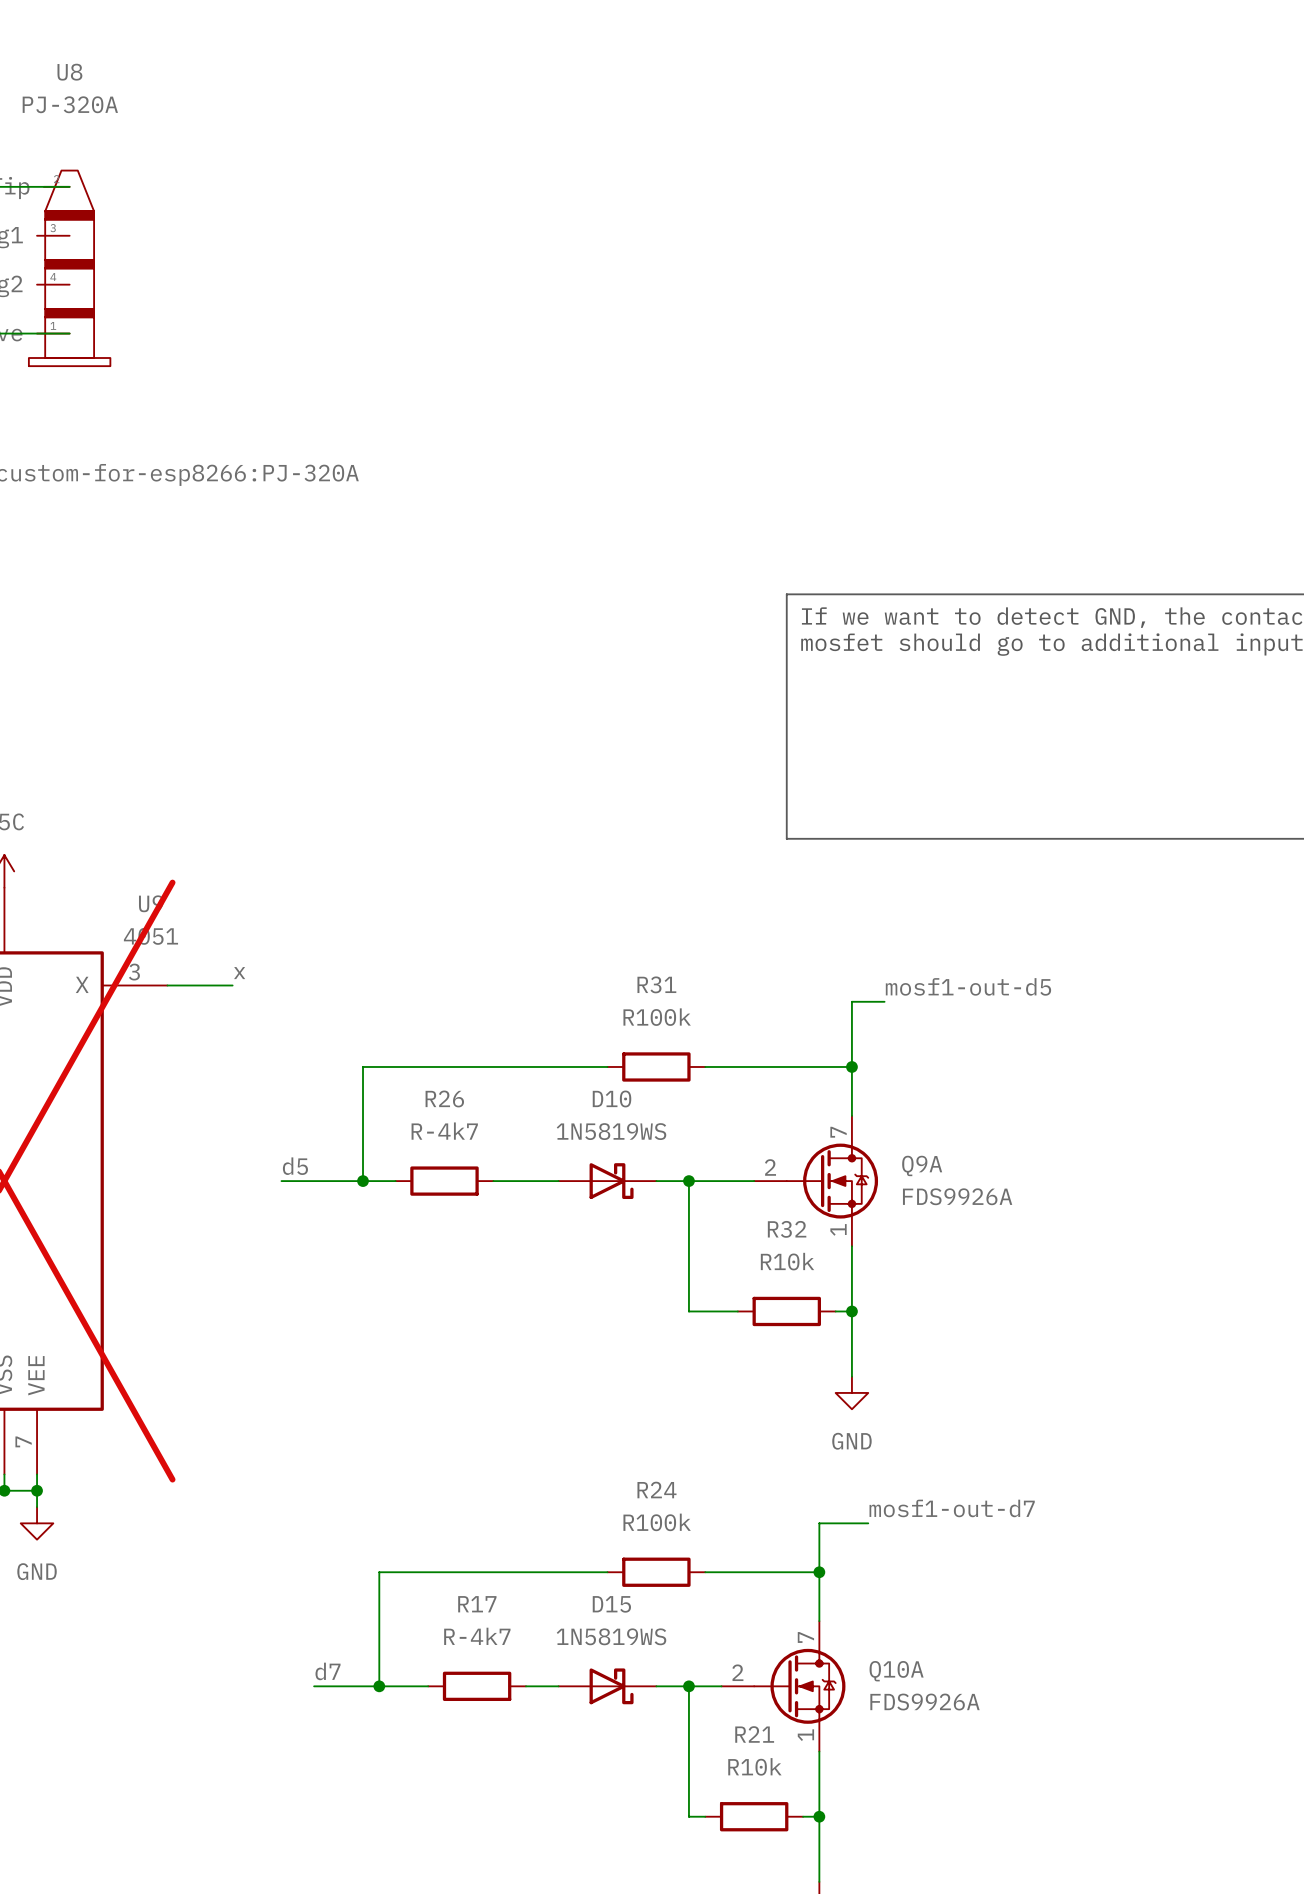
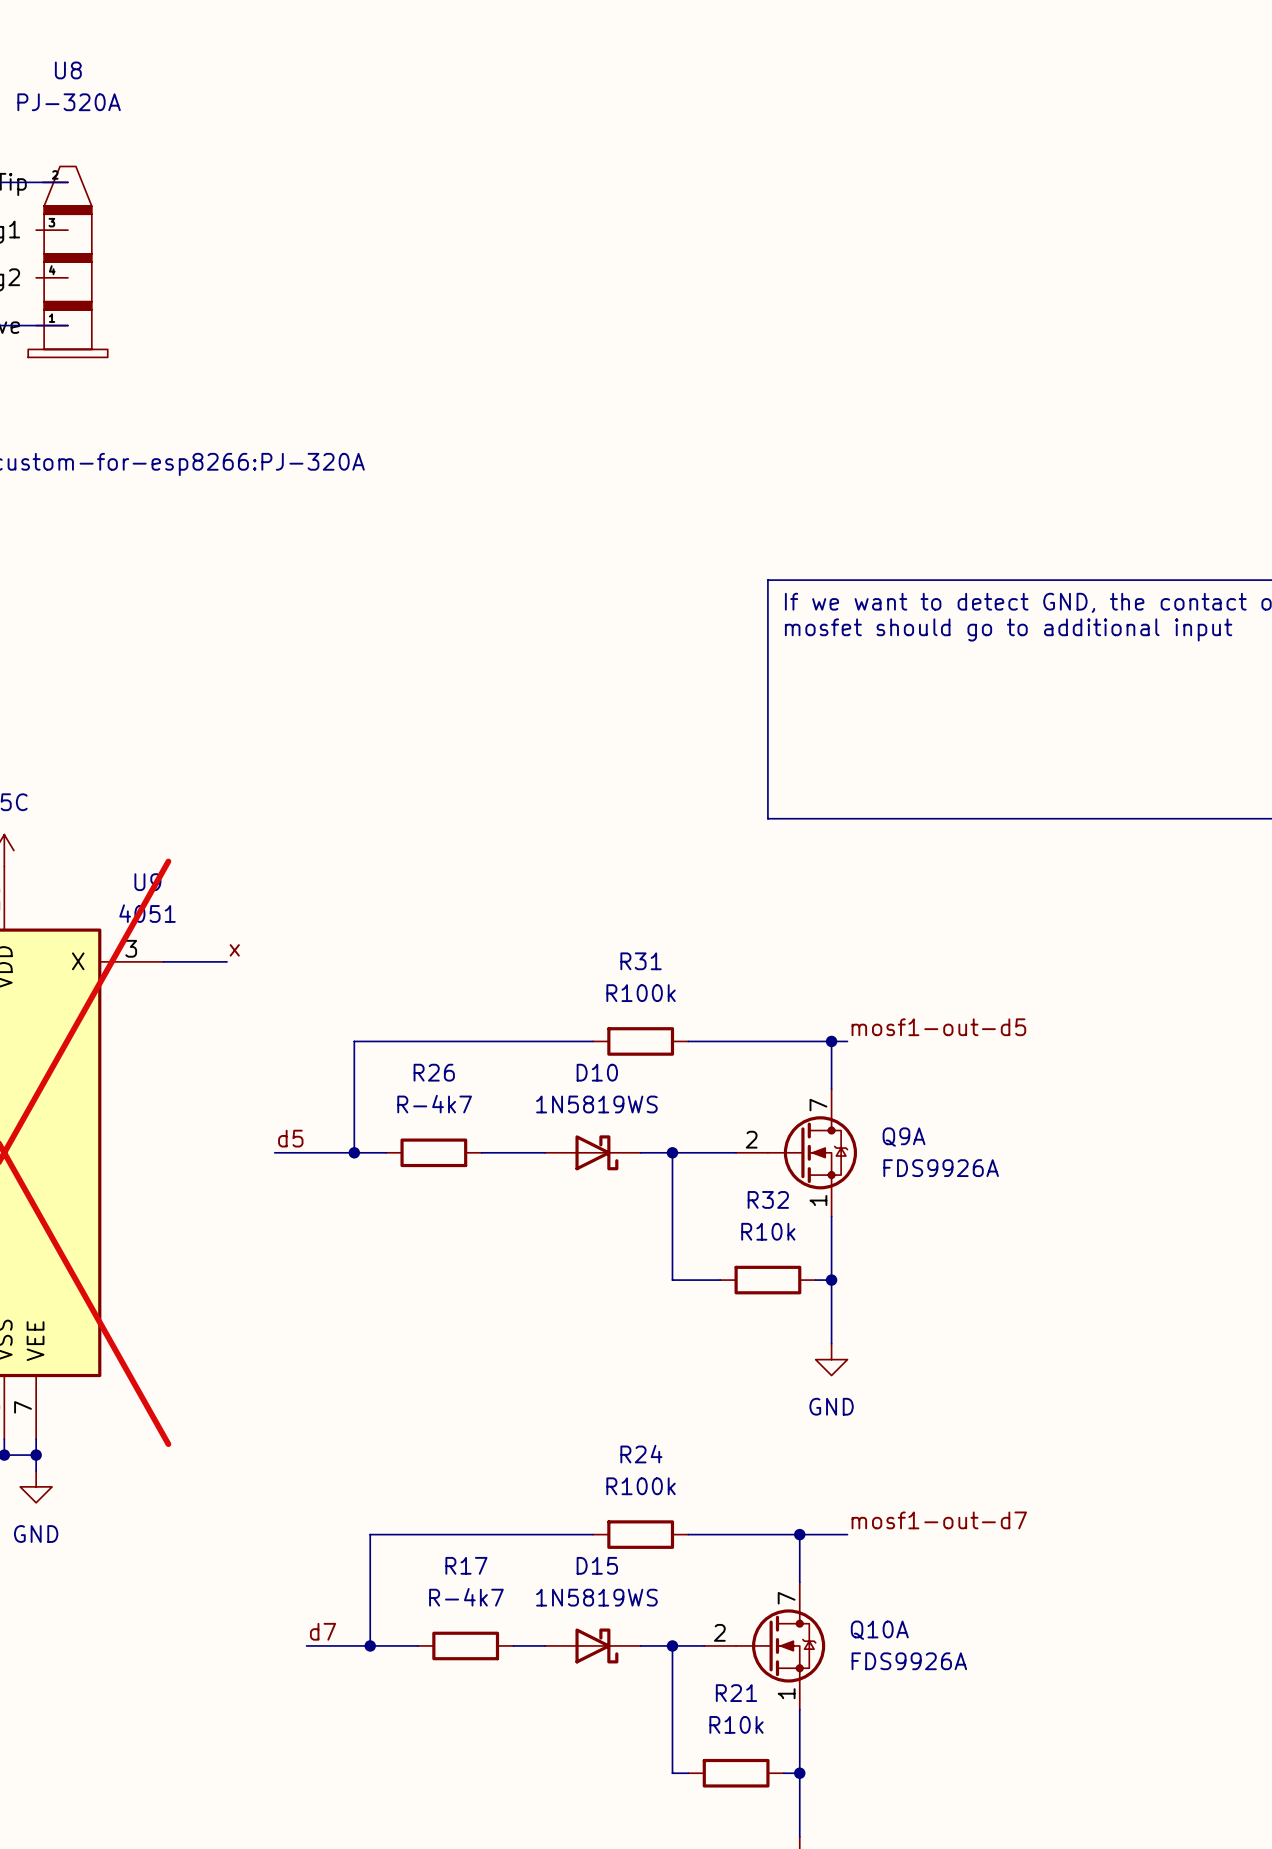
label position: mosf1-out-d5 (968, 986) -> mosf1-out-d5 (938, 1027)
wire: (884, 1001) (851, 1001) (851, 1066) -> (847, 1041) (831, 1041)
label position: mosf1-out-d7 (952, 1508) -> mosf1-out-d7 (939, 1520)
wire: (868, 1523) (819, 1523) (819, 1572) -> (847, 1534) (799, 1534)

